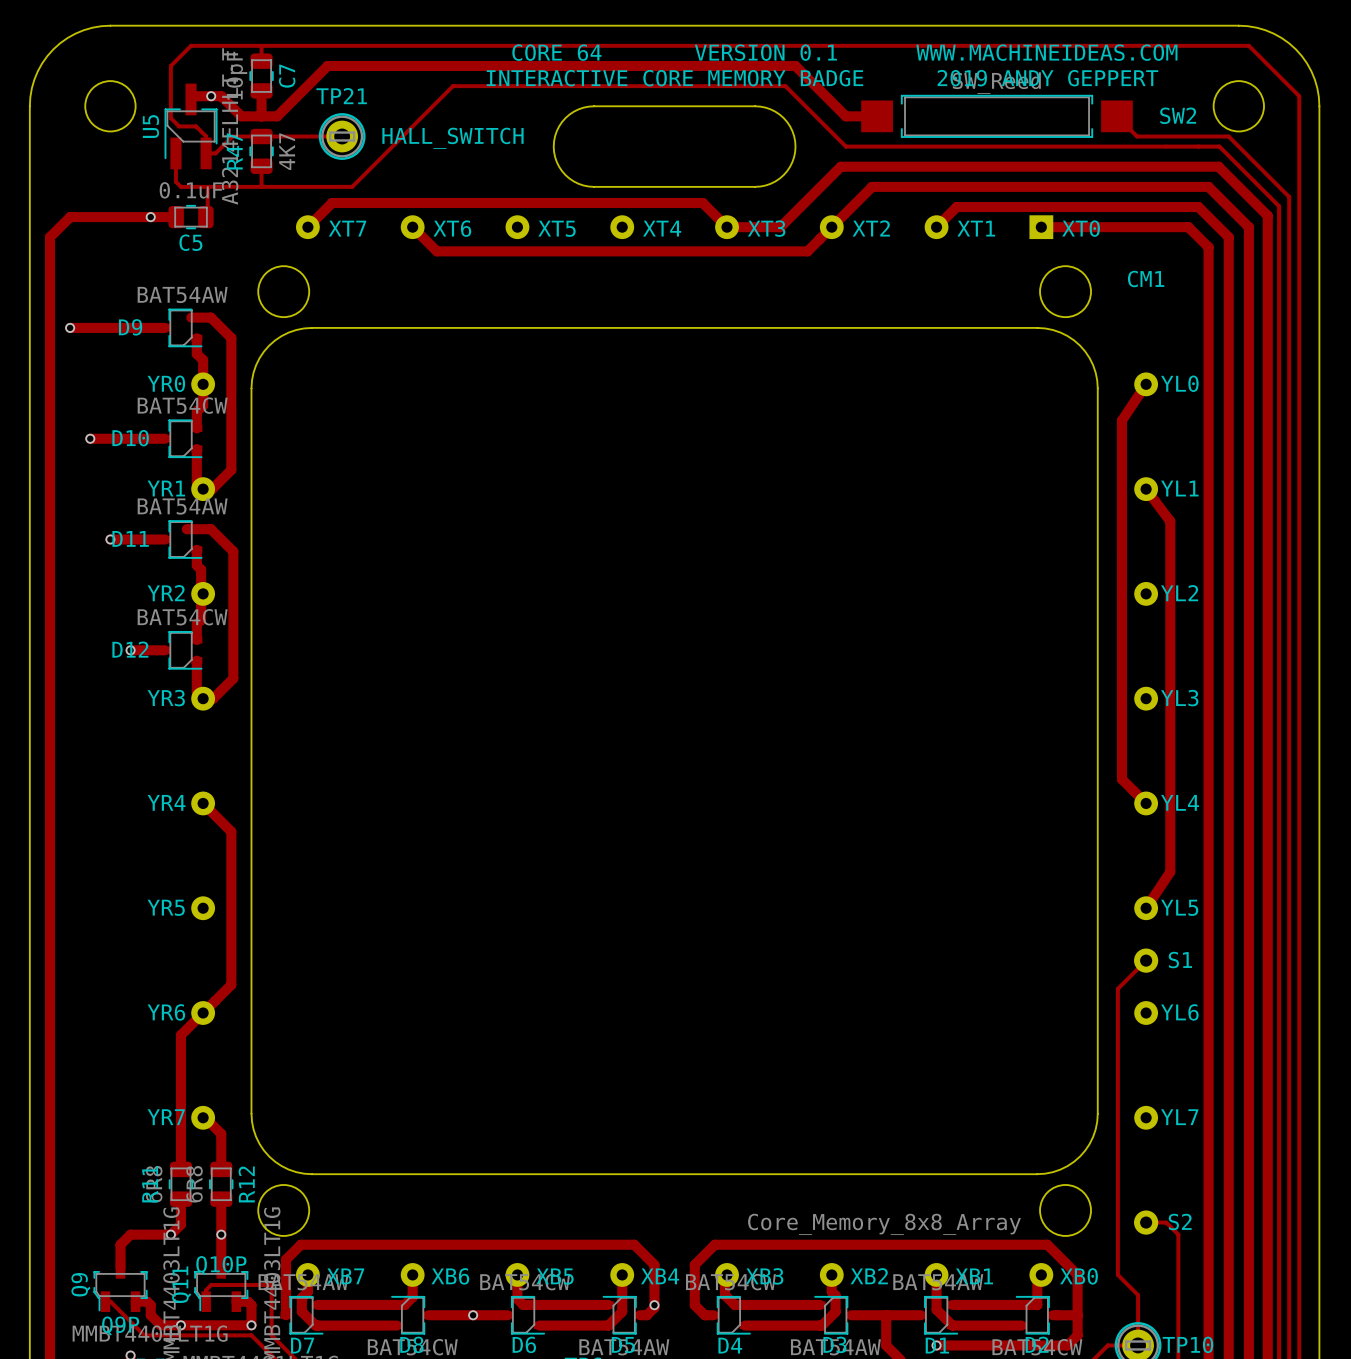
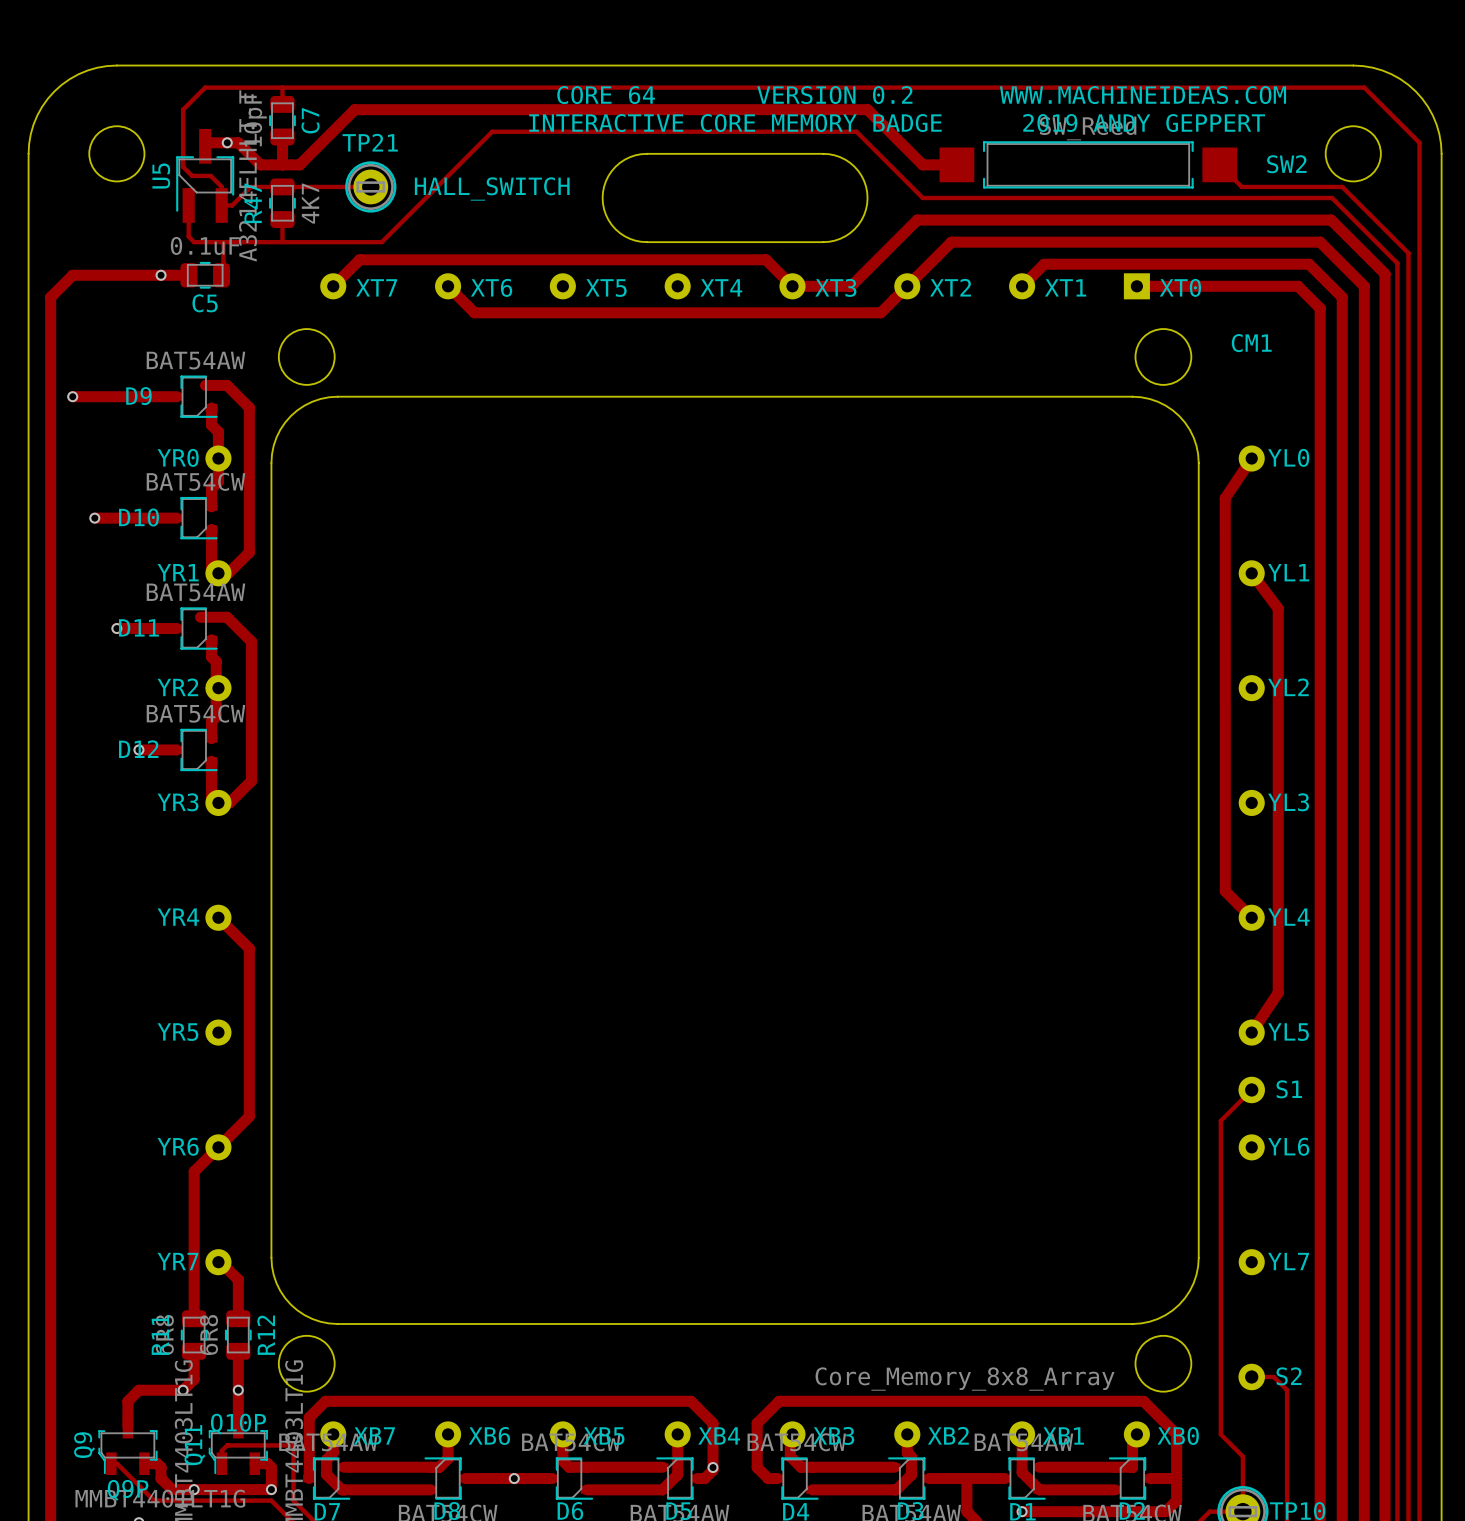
text: CORE 64 VERSION 0.1 (674, 52) -> CORE 64 VERSION 0.2 (734, 95)

